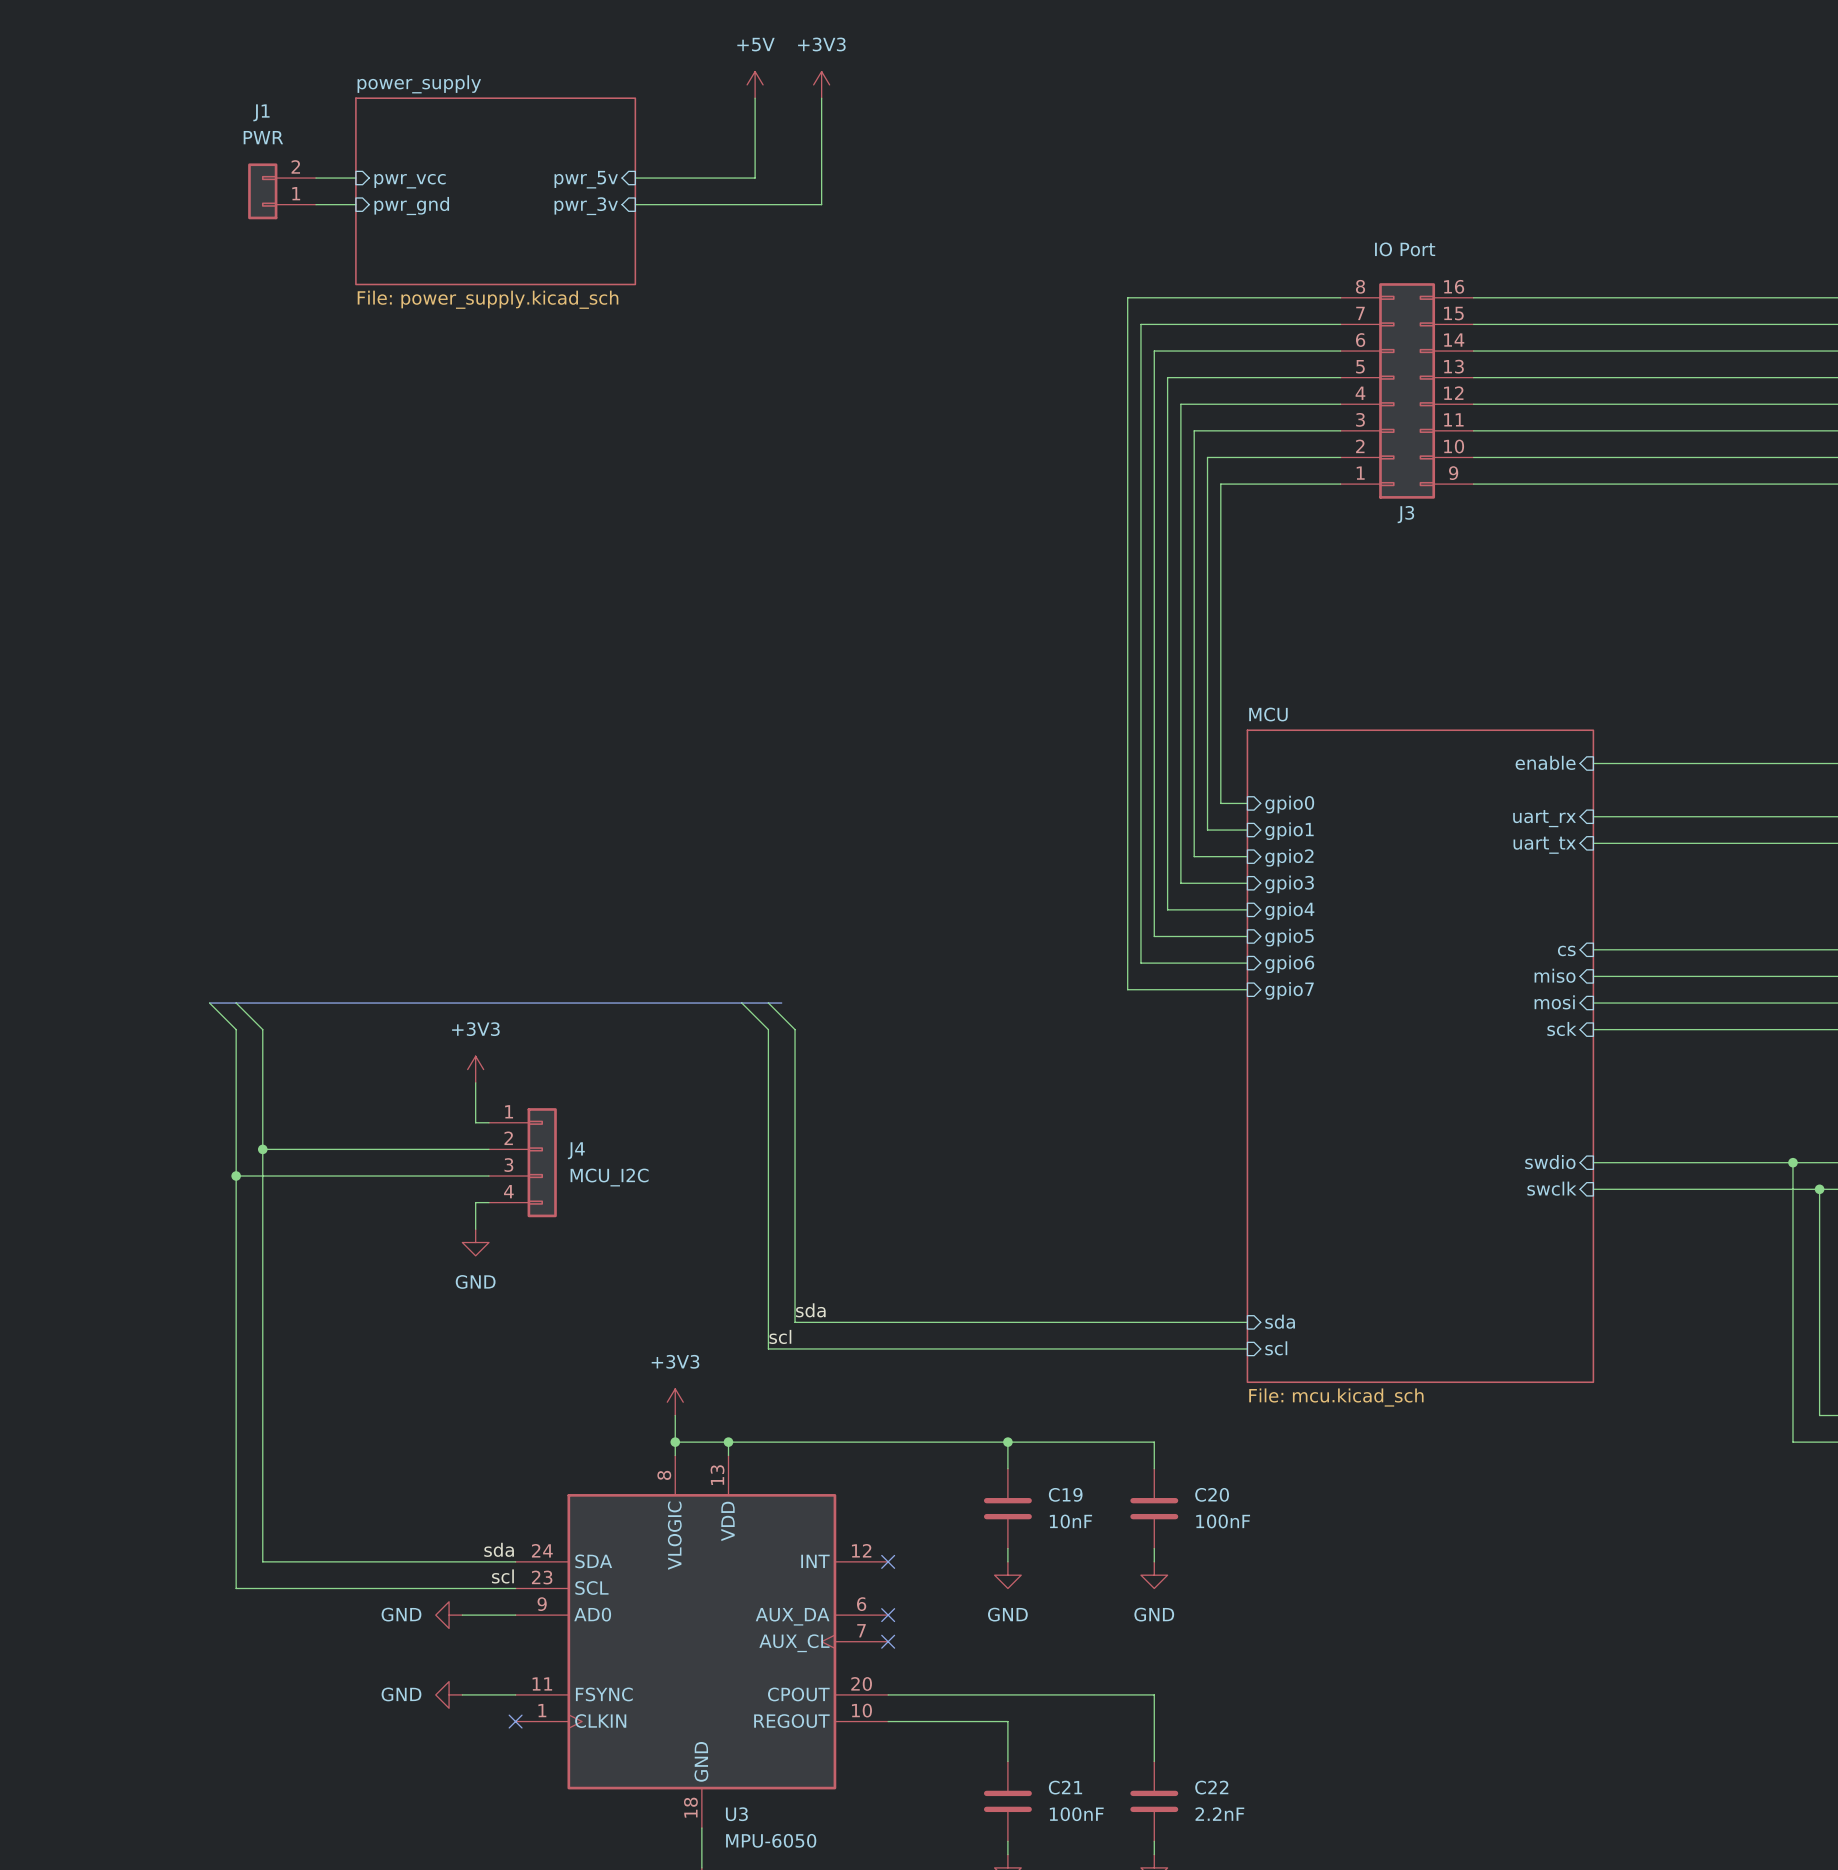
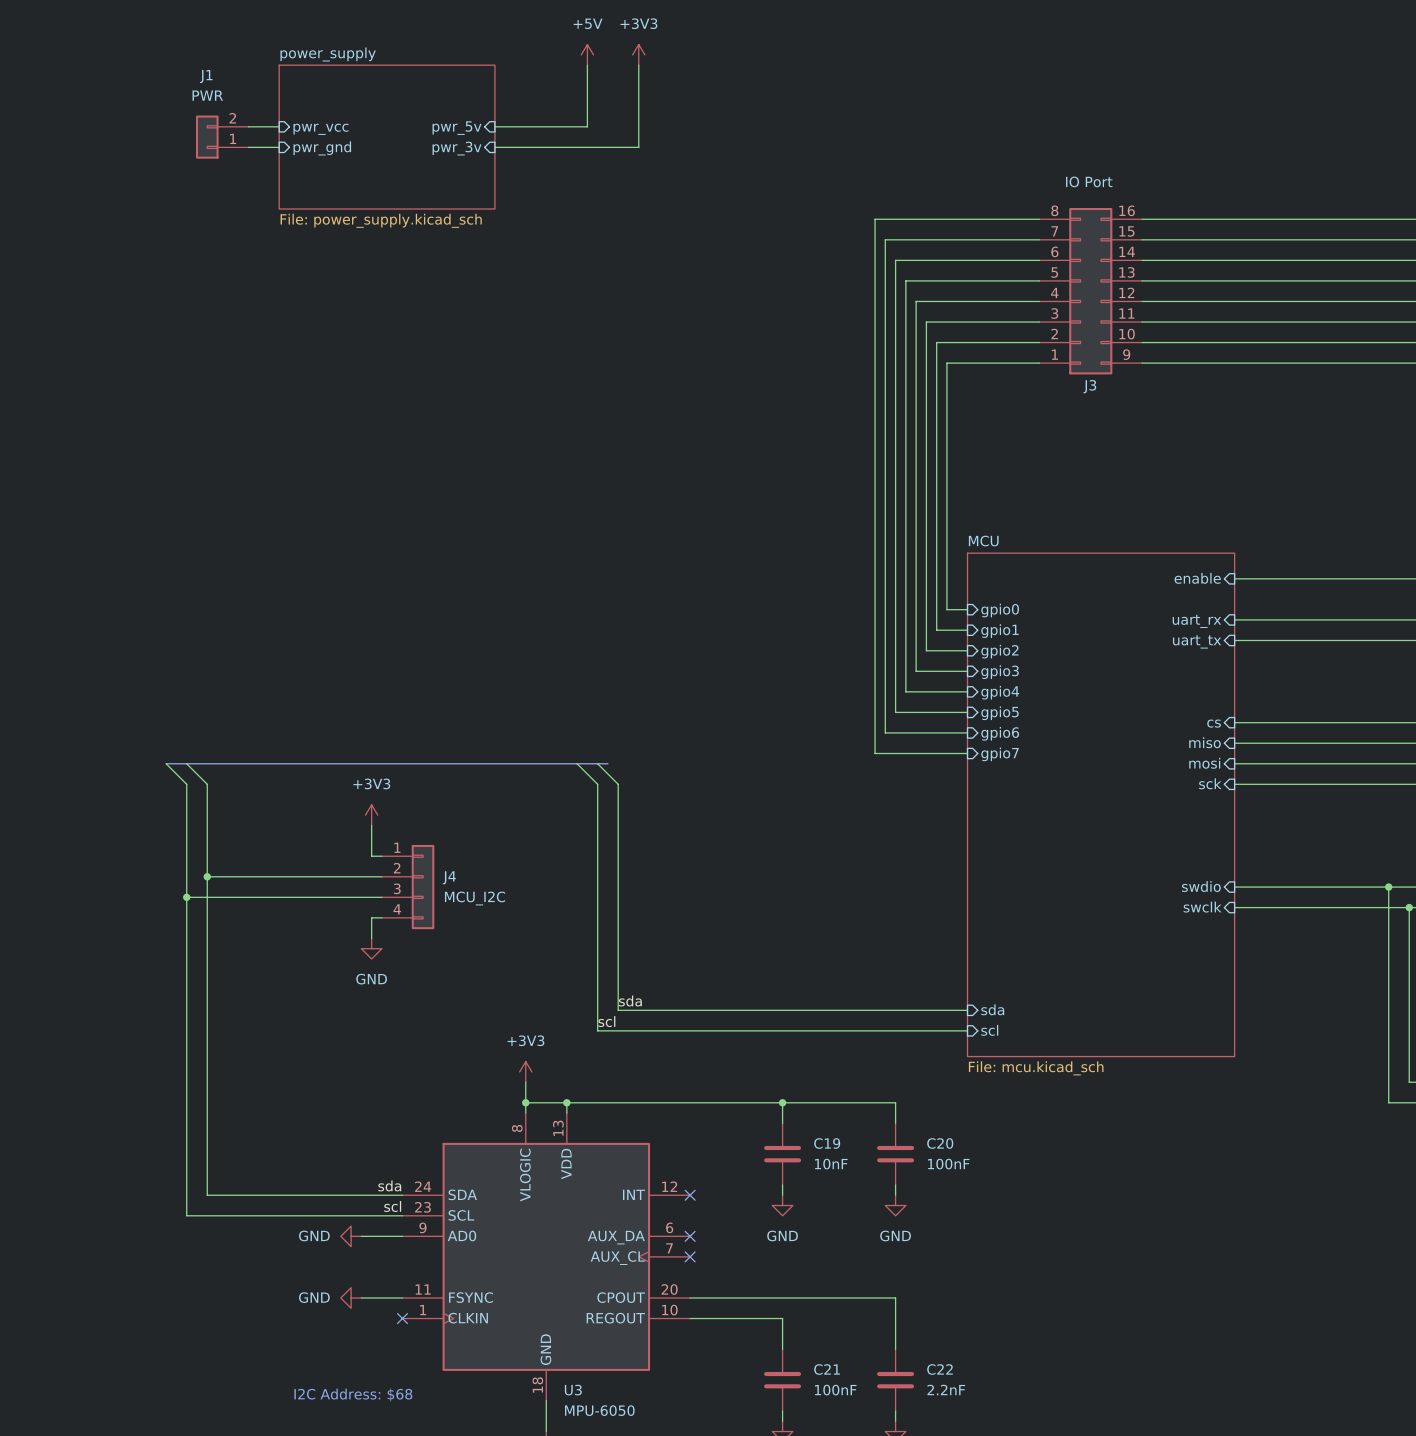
text: none -> I2C Address: $68 (353, 1395)

